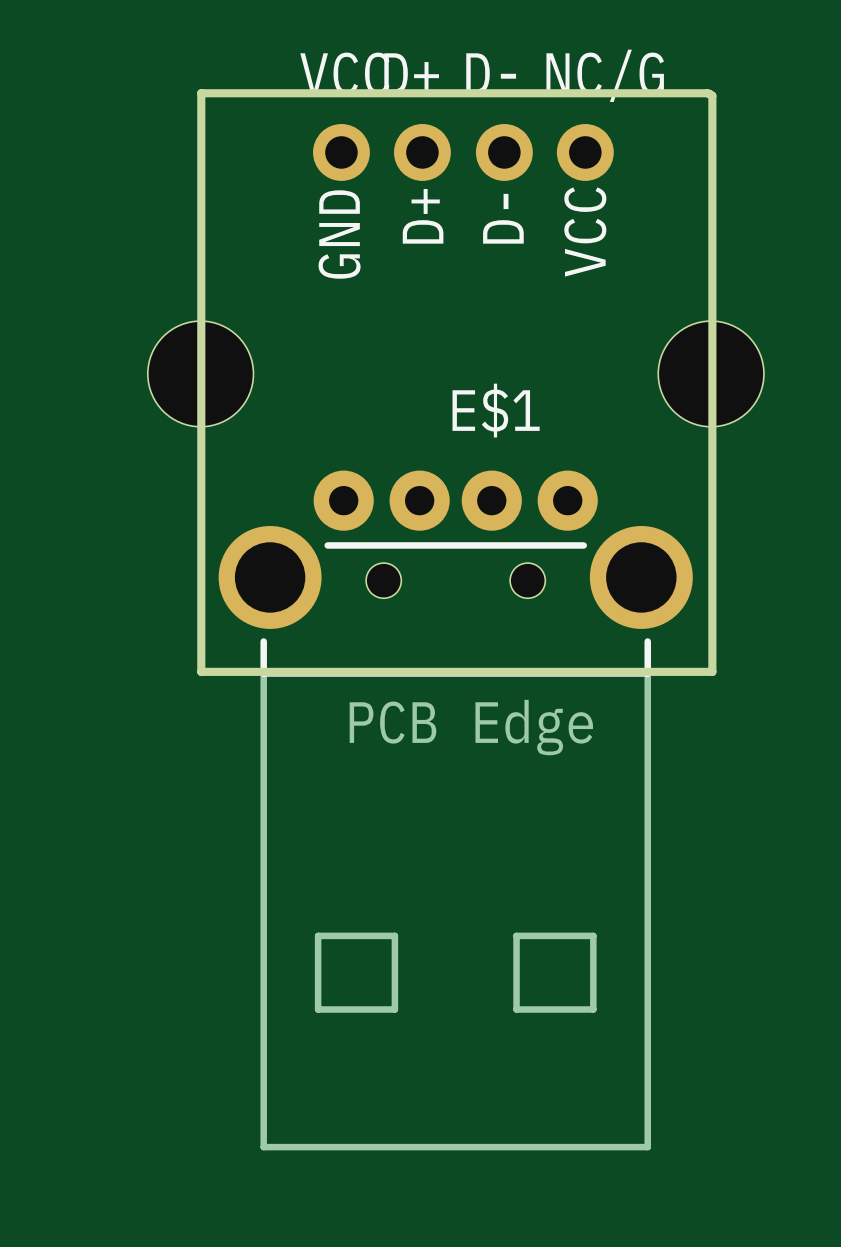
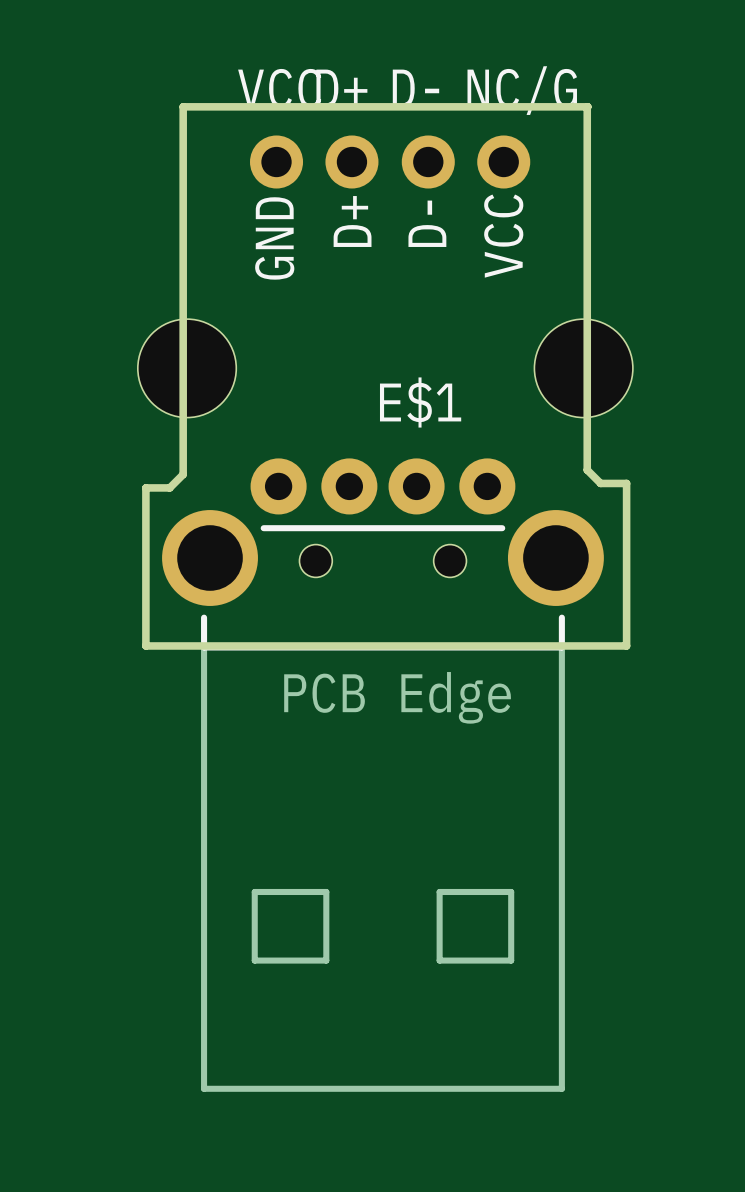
board edge: (241, 93) (201, 93) (201, 502) -> (183, 106) (183, 474) (169, 487) (145, 487)
board edge: (675, 93) (707, 93) (712, 95) (712, 671) -> (587, 106) (587, 470) (600, 483) (626, 483) (626, 645) (622, 645)
part position: (200, 373) -> (187, 368)
part position: (711, 373) -> (583, 368)

